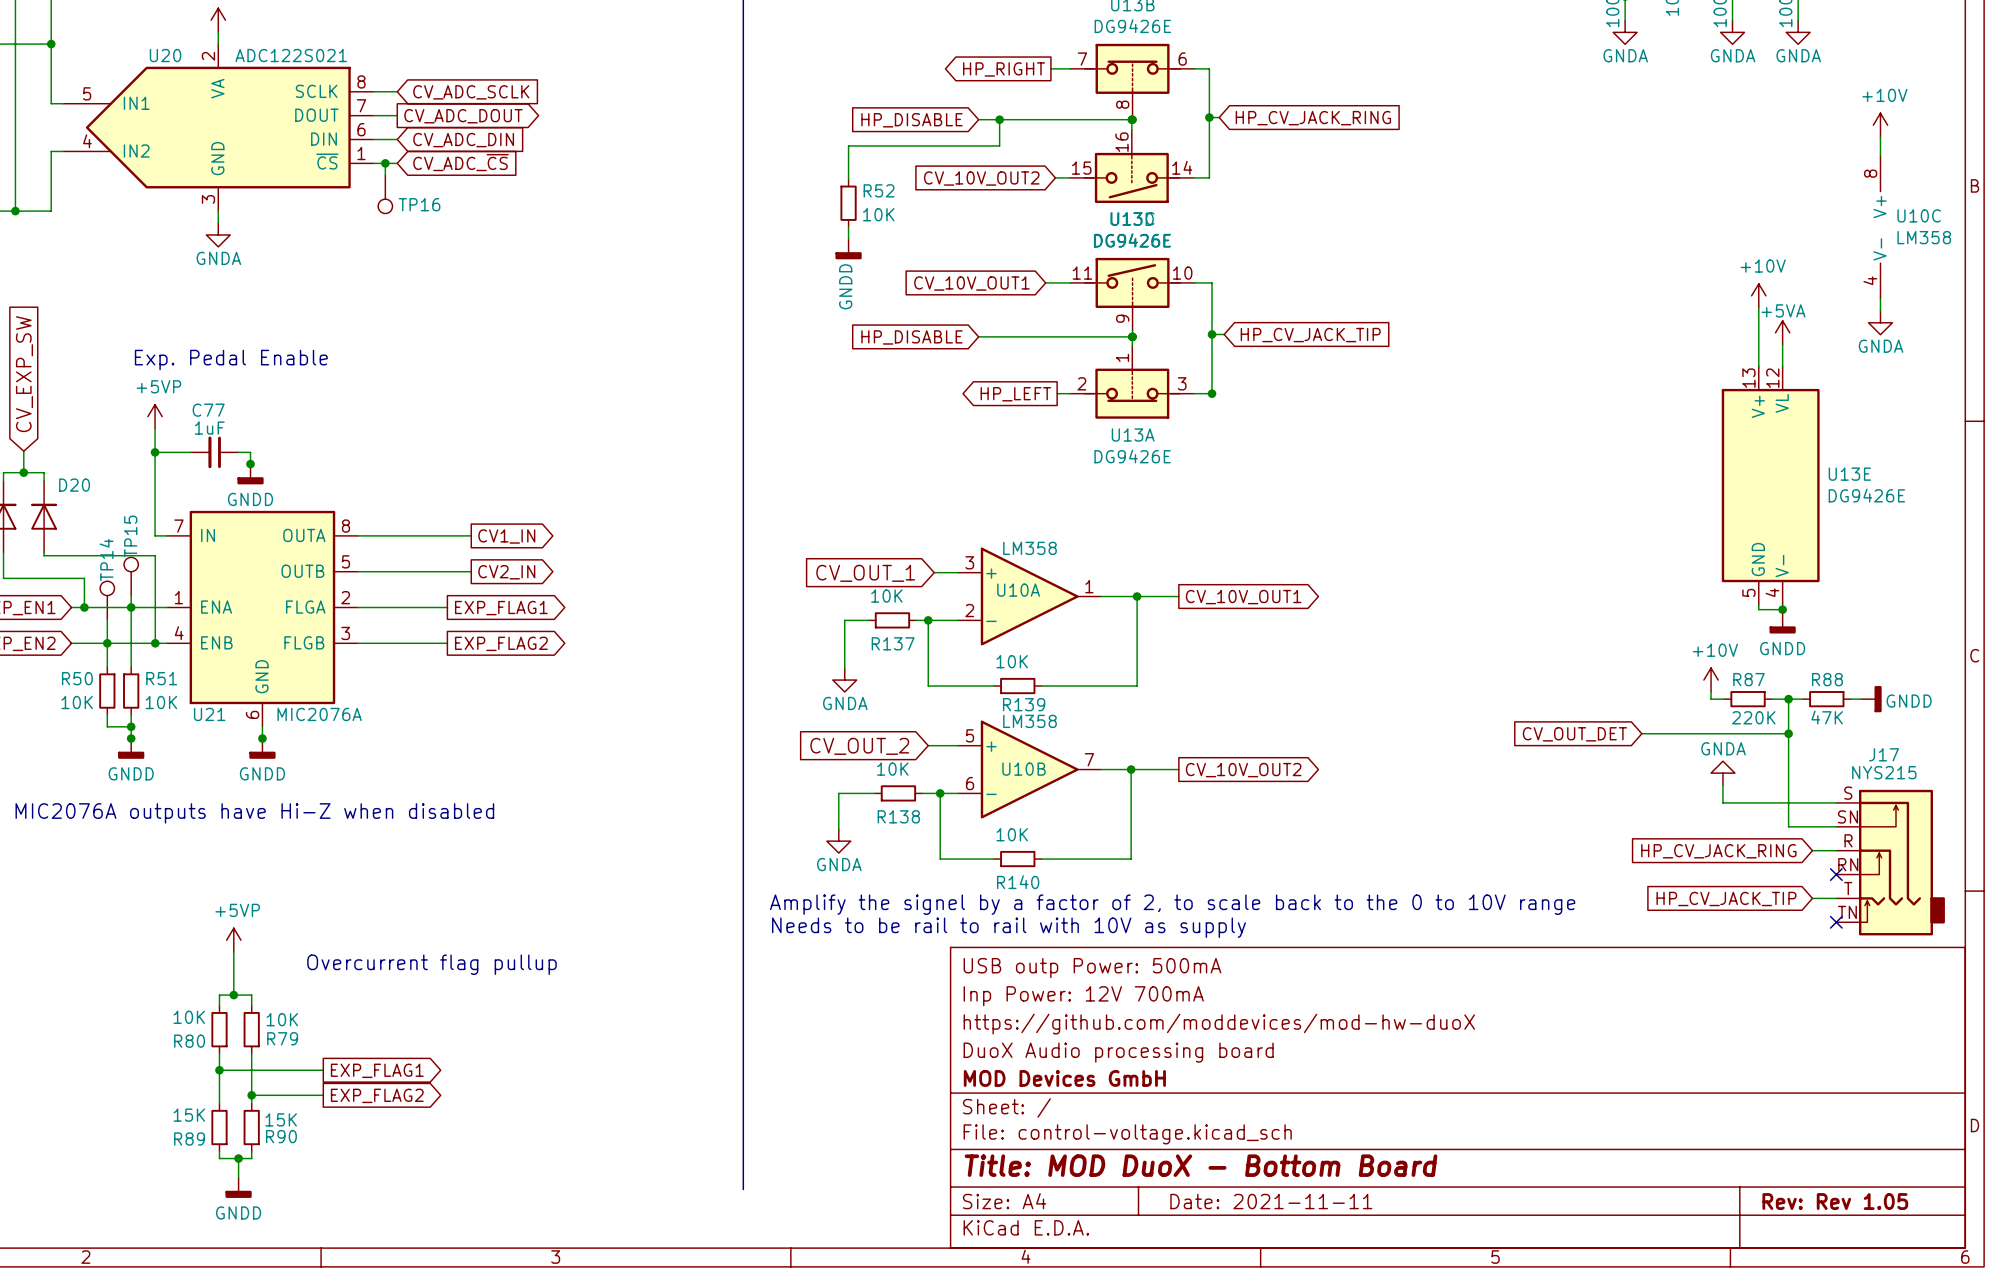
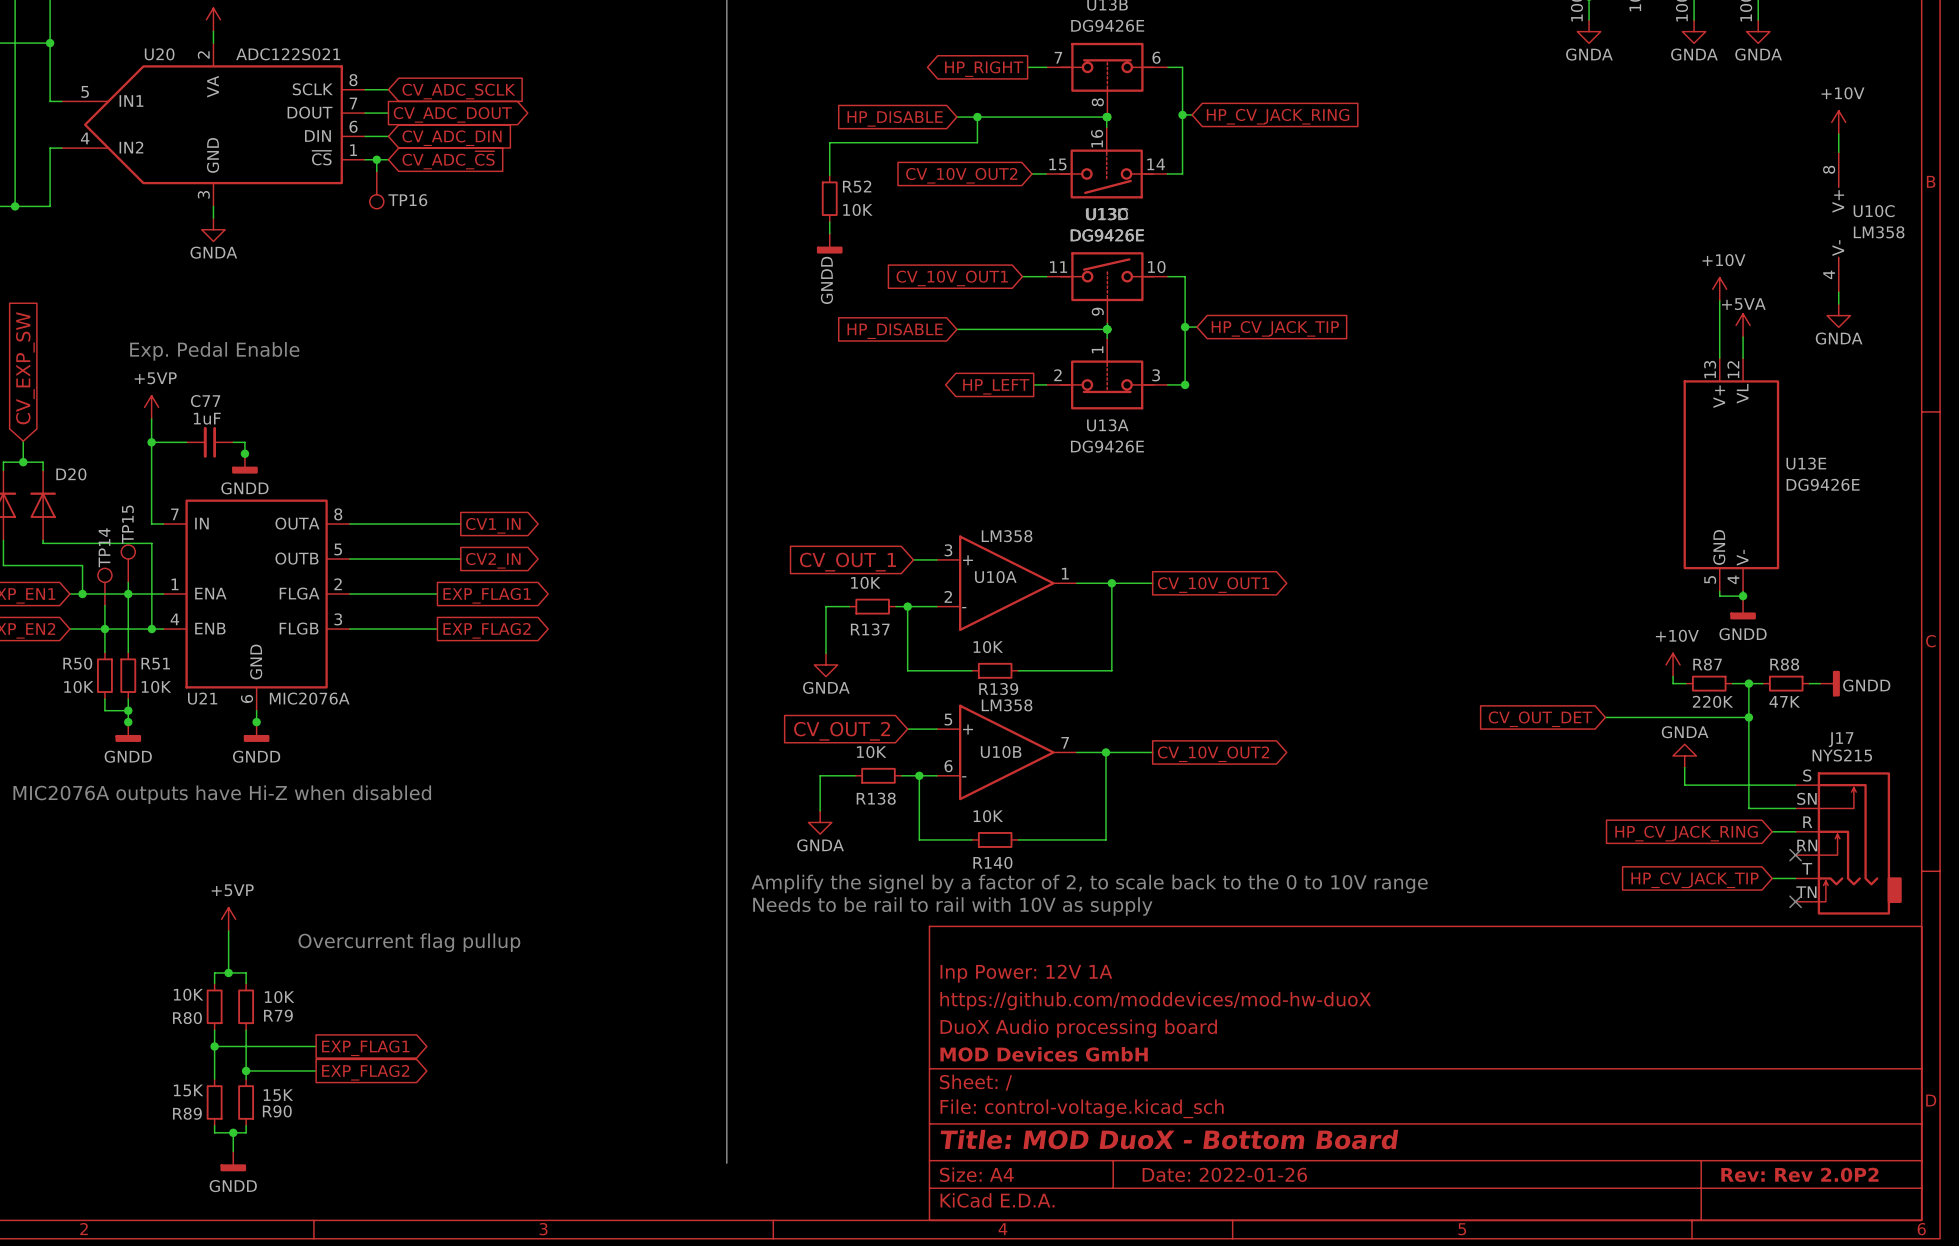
title block: USB outp Power: 500mA (1092, 968) -> none
title block: Inp Power: 12V 700mA (1083, 996) -> Inp Power: 12V 1A (1026, 973)
title block: Date: 2021-11-11 (1271, 1201) -> Date: 2022-01-26 (1224, 1174)
title block: Rev: Rev 1.05 (1835, 1201) -> Rev: Rev 2.0P2 (1799, 1174)

